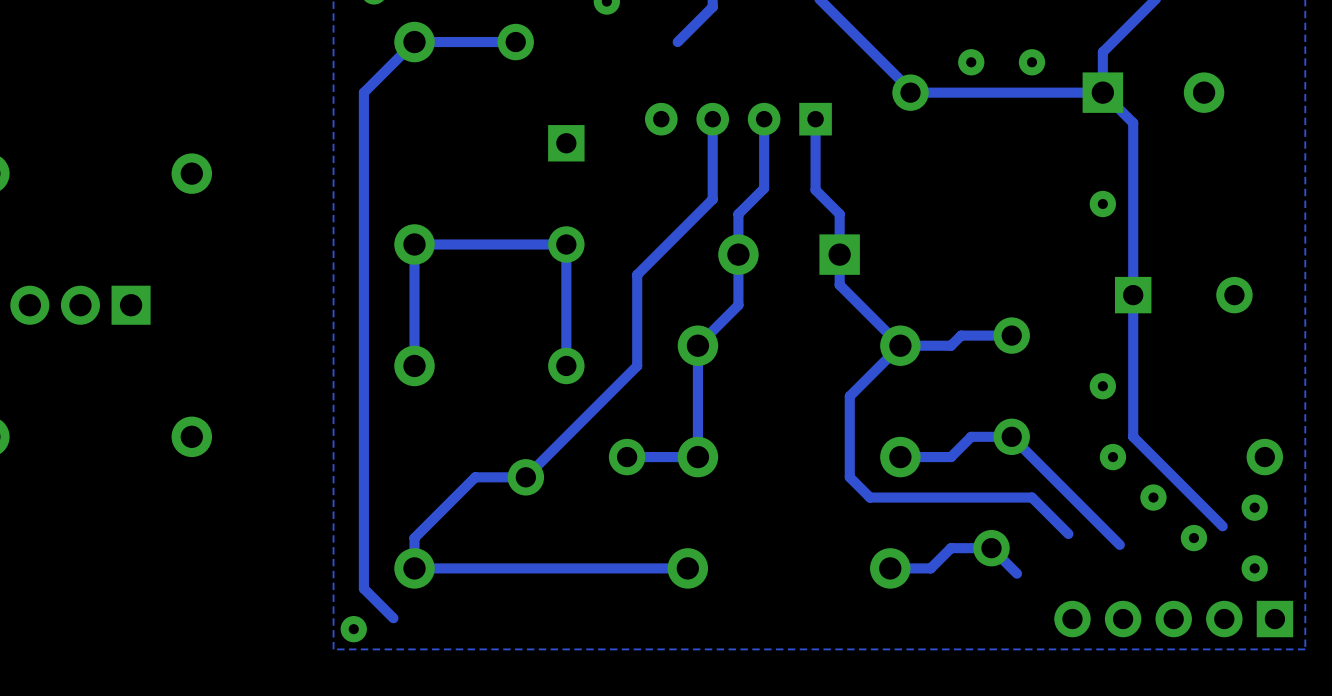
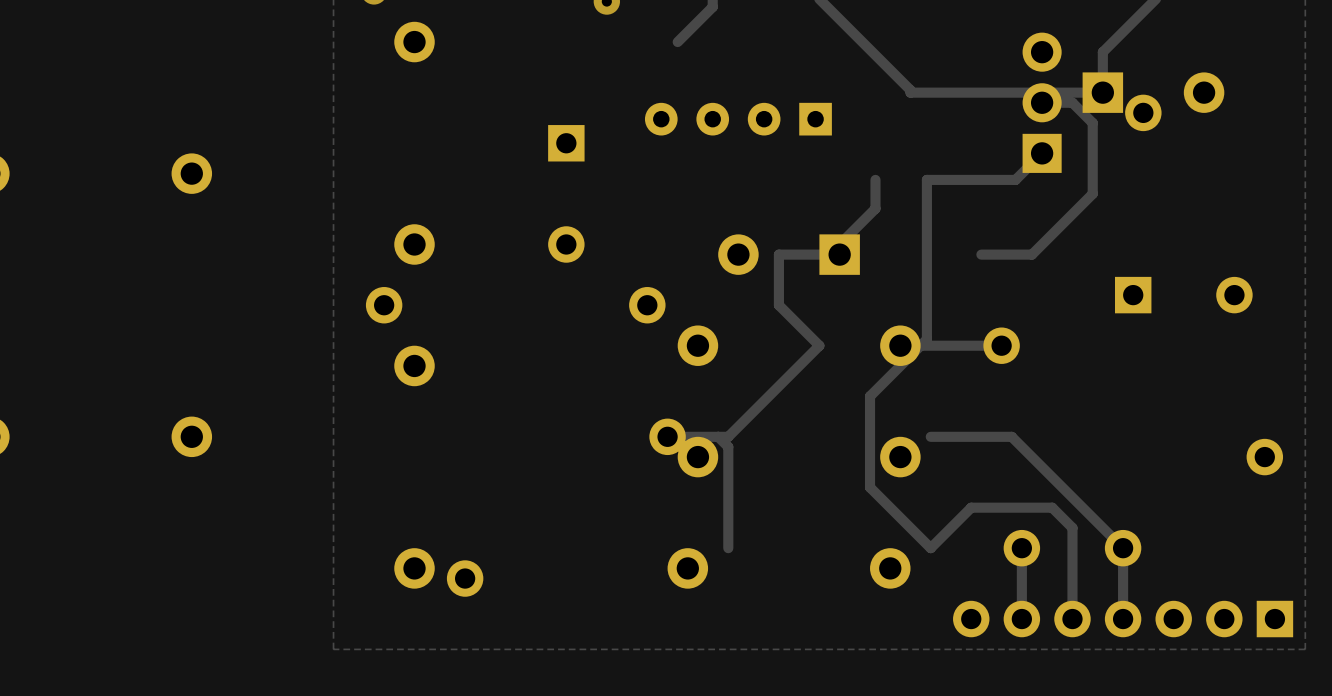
track: (515, 42) (414, 42) (363, 92) (363, 588) (393, 618) -> none
part: (515, 42) -> none
via: (971, 62) -> none
via: (1031, 62) -> none
part: (910, 92) -> none
track: (1102, 92) (1133, 123) (1133, 436) (1222, 526) -> none
track: none -> (1042, 102) (1072, 102) (1092, 123) (1092, 193) (1031, 254) (981, 254)
part: none -> (1042, 102)
part: none -> (1143, 112)
track: (712, 119) (712, 199) (637, 274) (637, 365) (525, 477) (475, 477) (414, 538) (414, 568) (687, 568) -> none
track: (764, 119) (764, 188) (738, 214) (738, 305) (697, 345) (697, 457) (627, 457) -> none
track: (815, 119) (815, 190) (839, 214) (839, 284) (900, 345) -> none
track: none -> (1042, 153) (1015, 179) (926, 179) (926, 339) (870, 396) (870, 487) (930, 548) (971, 507) (1052, 507) (1072, 527) (1072, 619)
track: none -> (875, 179) (875, 208) (829, 254) (778, 254) (778, 305) (819, 345) (728, 436) (667, 436)
via: (1102, 204) -> none
part: (80, 305) -> none
part: none -> (384, 305)
part: none -> (647, 305)
track: (1011, 335) (961, 335) (951, 345) -> (1001, 345) (951, 345)
part position: (1011, 335) -> (1001, 345)
track: (900, 345) (849, 396) (849, 477) (870, 497) (1031, 497) (1068, 534) -> none
track: (566, 365) (566, 244) (414, 244) (414, 365) -> none
part: (566, 365) -> none
via: (1102, 386) -> none
track: none -> (718, 436) (728, 446) (728, 548)
track: (971, 436) (951, 457) (900, 457) -> (971, 436) (930, 436)
part: (1011, 436) -> none
part position: (627, 457) -> (667, 436)
via: (1112, 457) -> none
part: (525, 477) -> none
via: (1153, 497) -> none
via: (1254, 507) -> none
via: (1193, 538) -> none
track: none -> (1119, 544) (1123, 548) (1123, 619)
part position: (991, 548) -> (1021, 548)
track: none -> (1021, 548) (1021, 619)
part: none -> (1123, 548)
track: (890, 568) (930, 568) (951, 548) (991, 548) (1017, 573) -> none
via: (1254, 568) -> none
part: none -> (465, 578)
part: none -> (1123, 619)
part: (1173, 619) -> none
via: (353, 629) -> none

